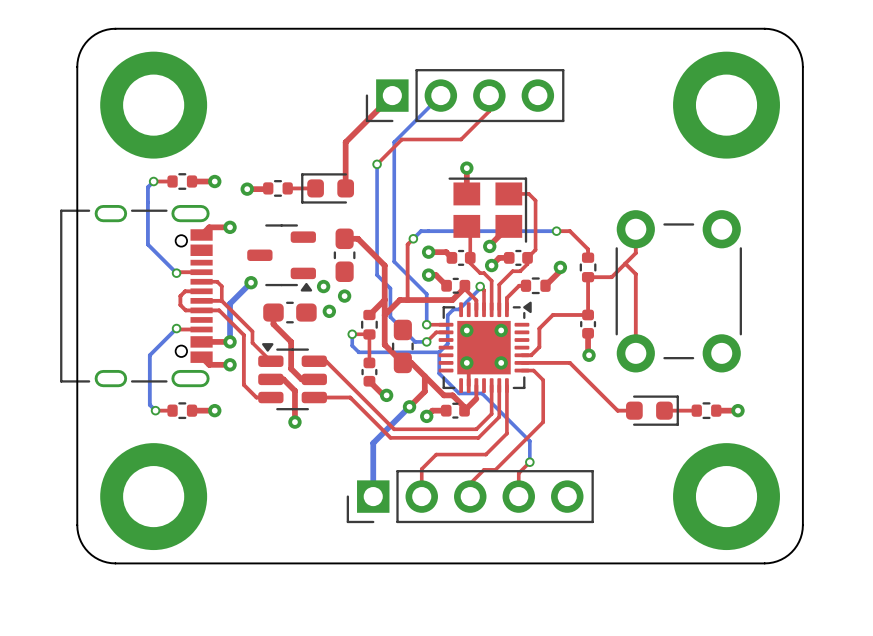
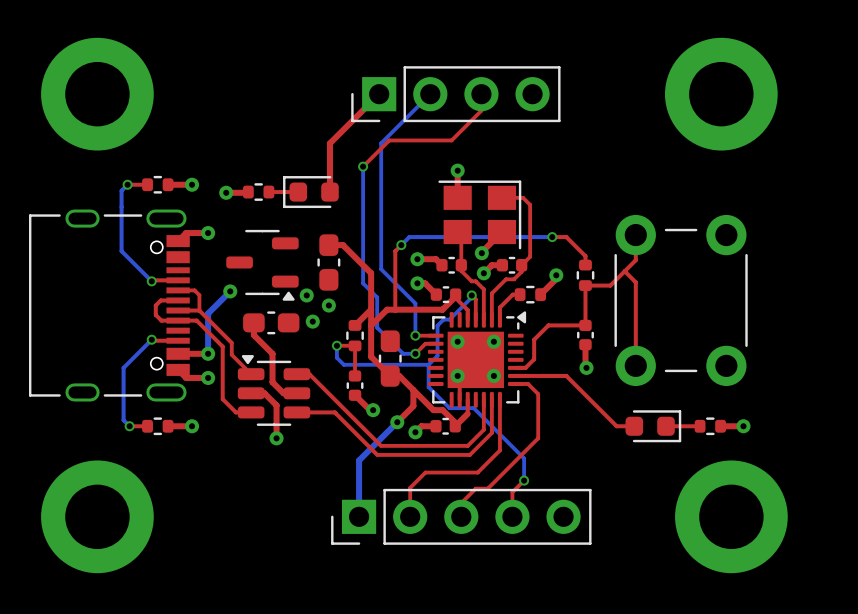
board edge: (115, 28) (764, 28) (777, 30) (788, 37) (799, 50) (802, 66) (802, 525) (800, 537) (794, 549) (781, 559) (764, 563) (115, 563) (102, 561) (91, 555) (81, 541) (77, 525) (77, 66) (79, 54) (88, 39) (102, 30) (115, 28) -> none
part position: (153, 105) -> (97, 94)
part position: (726, 105) -> (721, 94)
part position: (153, 496) -> (97, 516)

